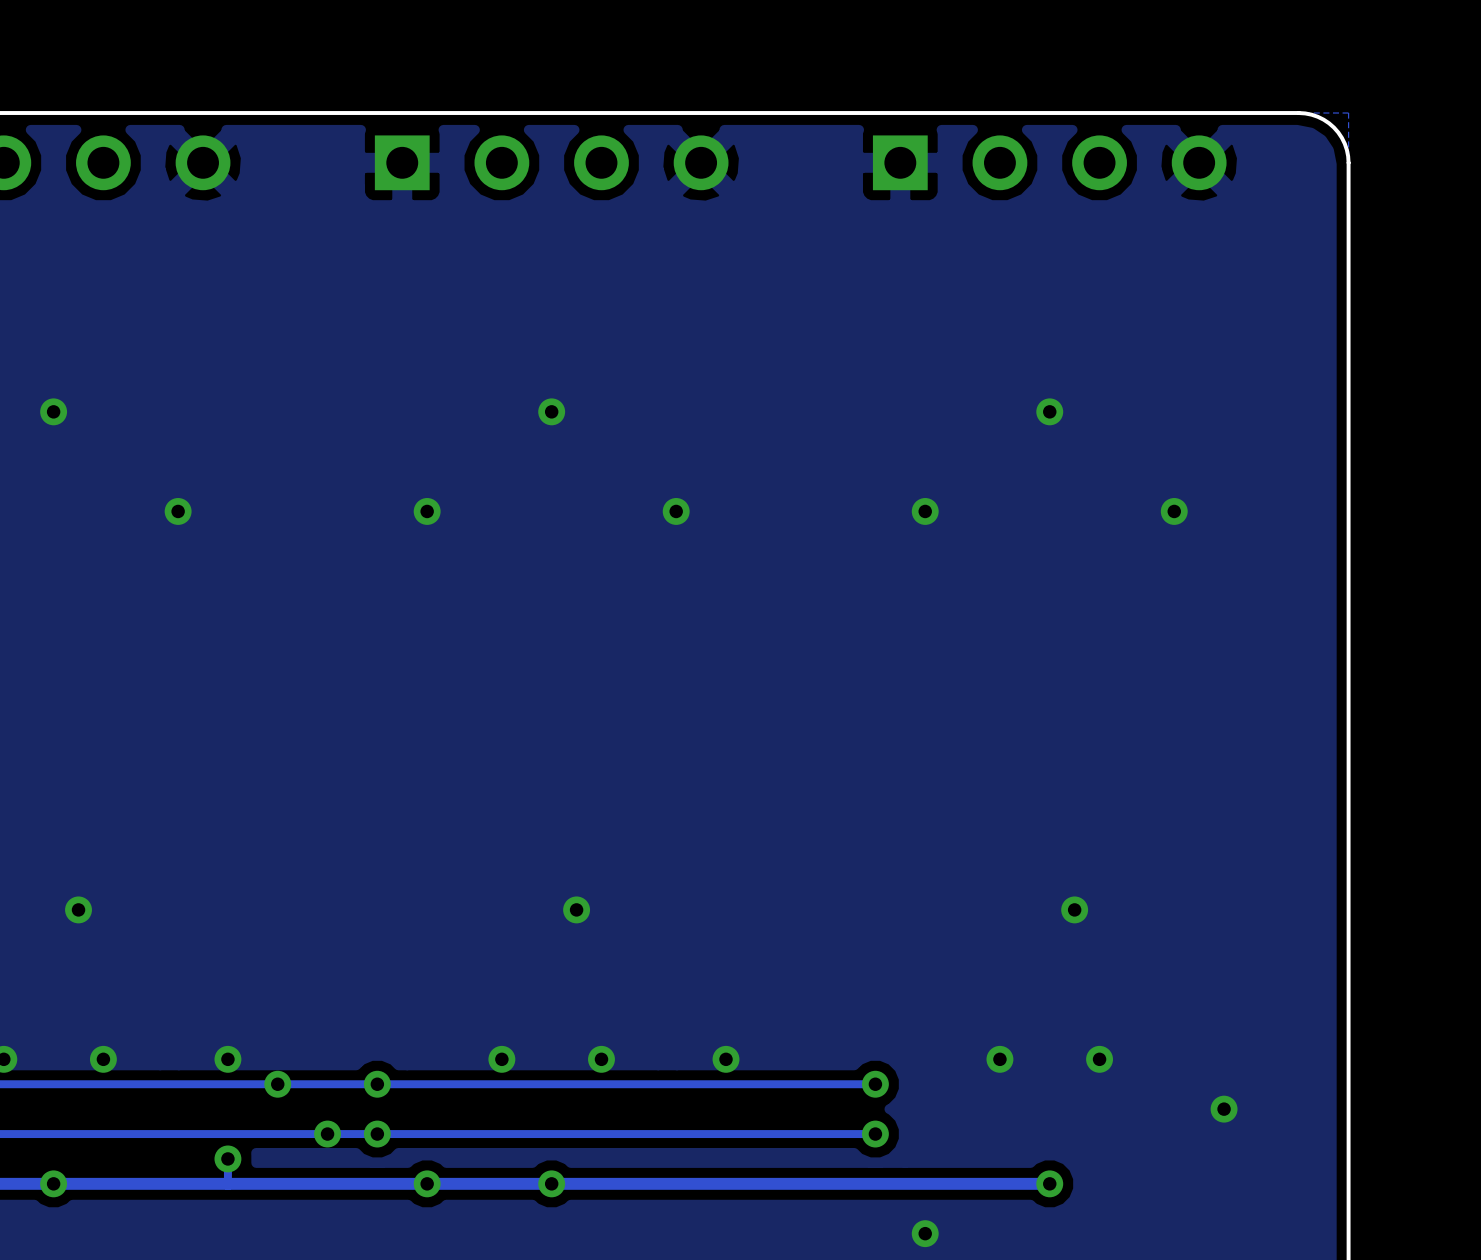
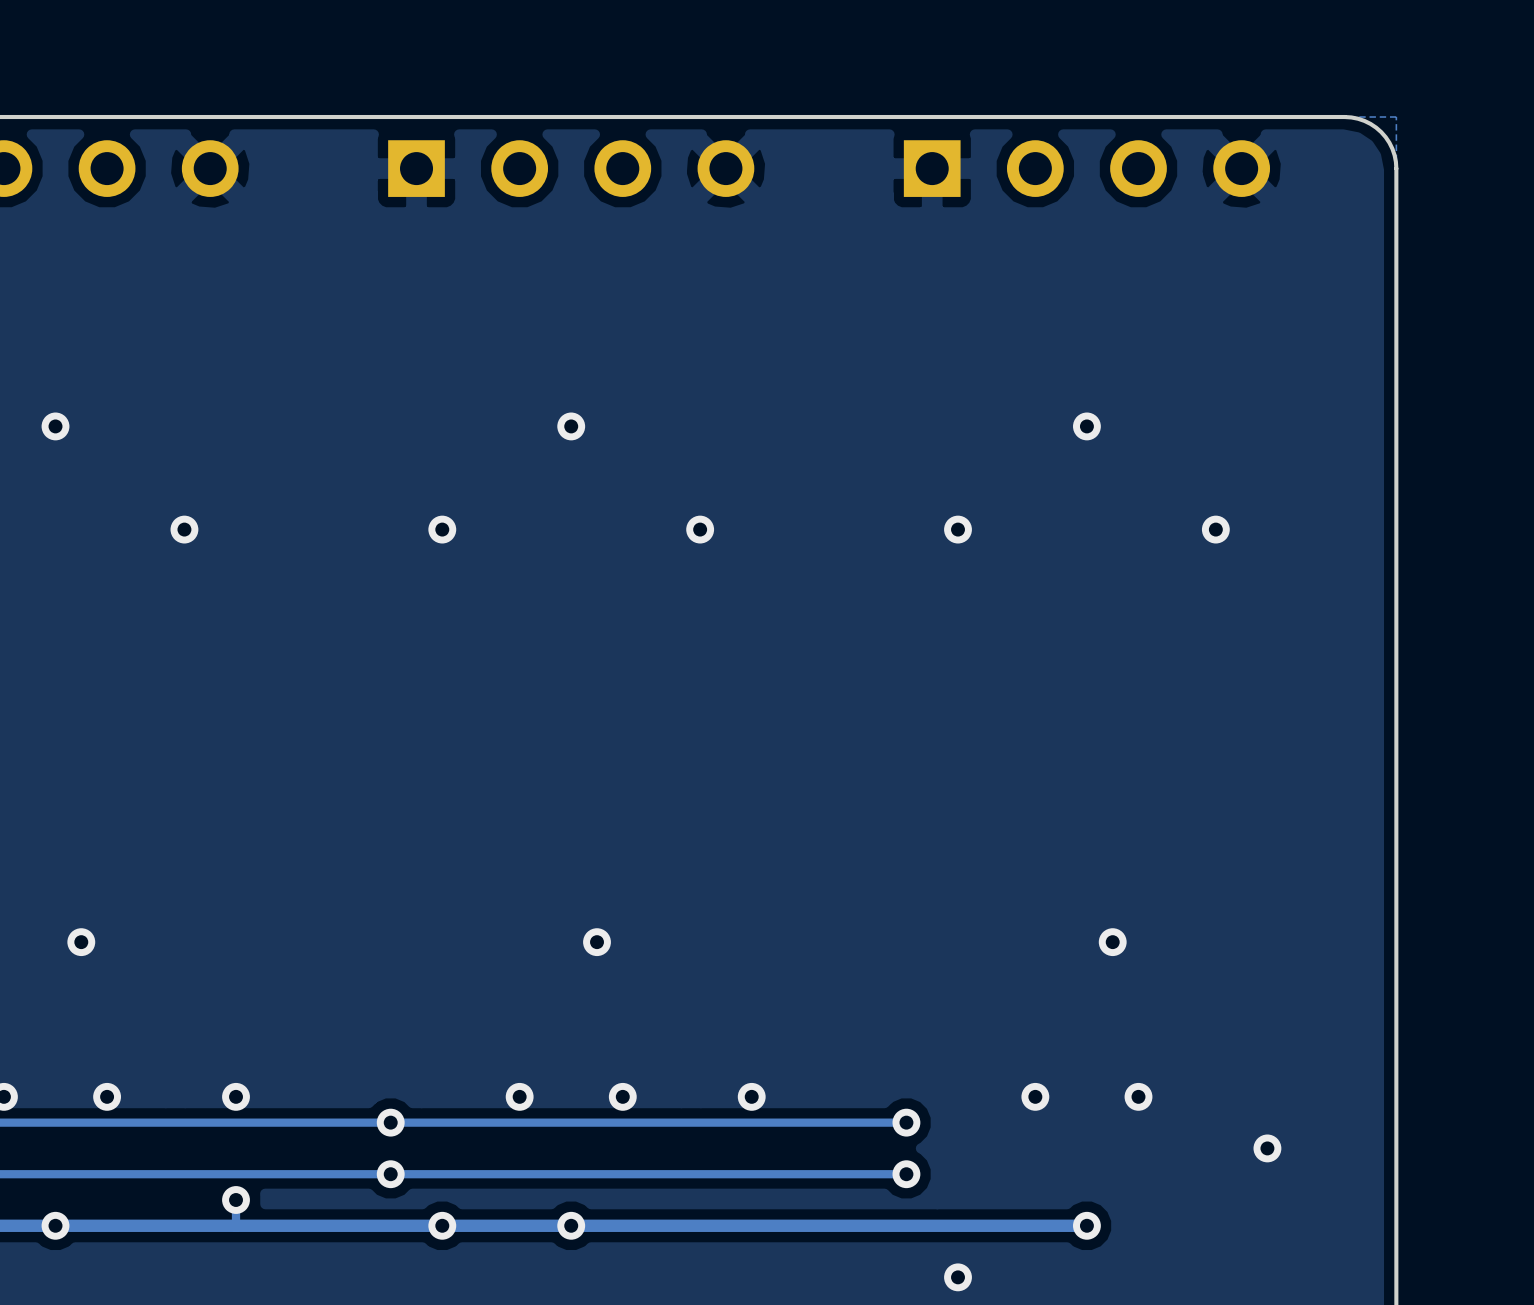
via: (277, 1084) -> none
via: (327, 1134) -> none

